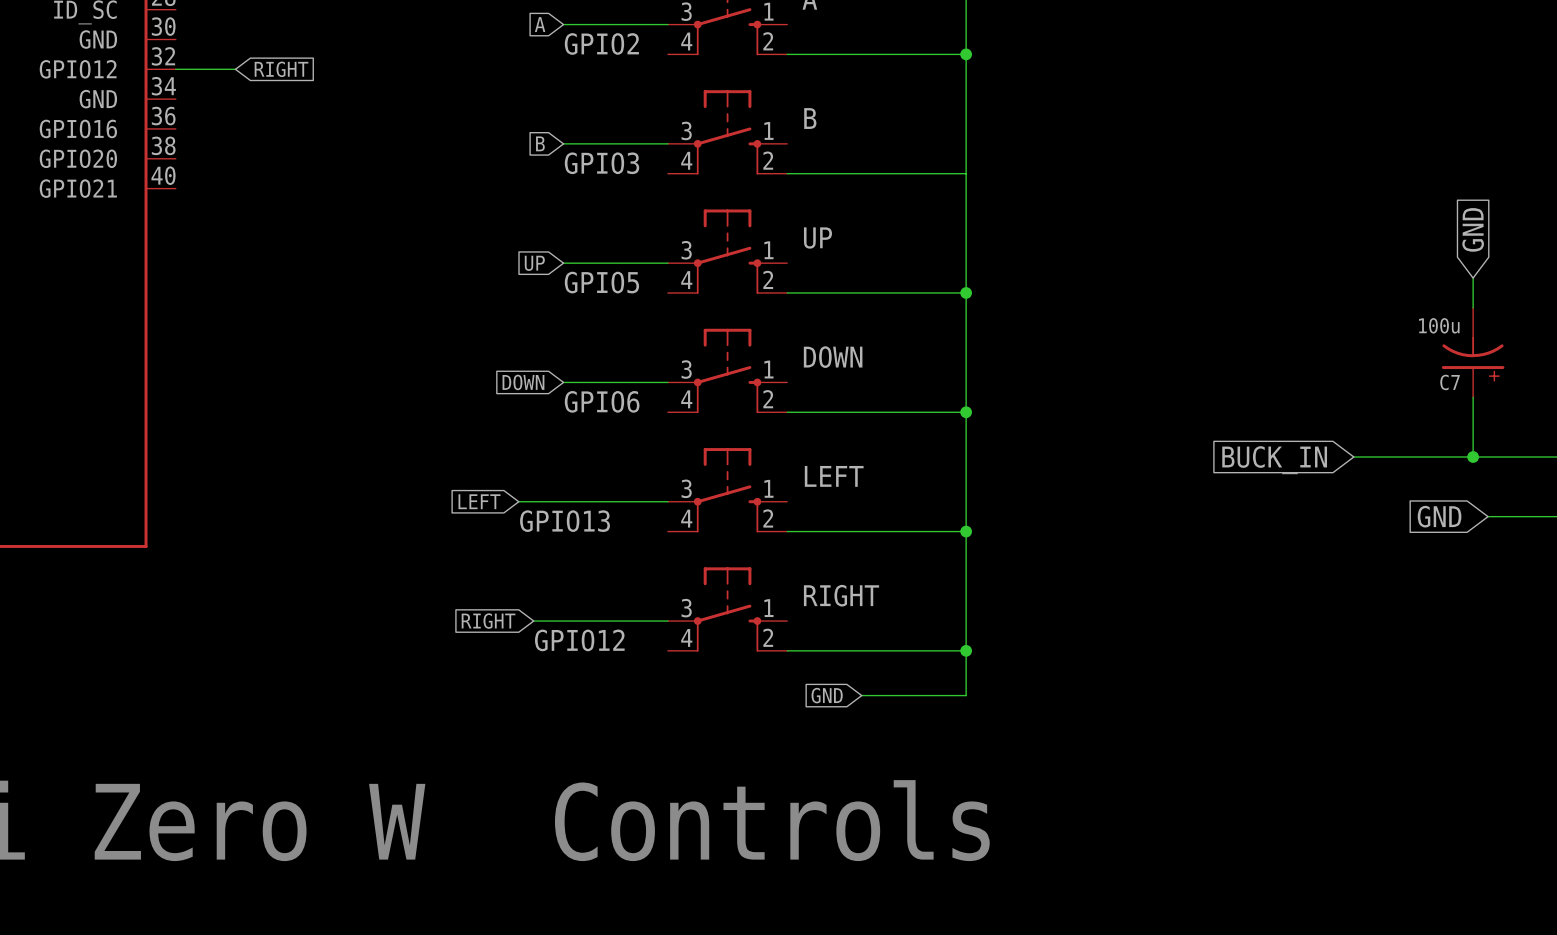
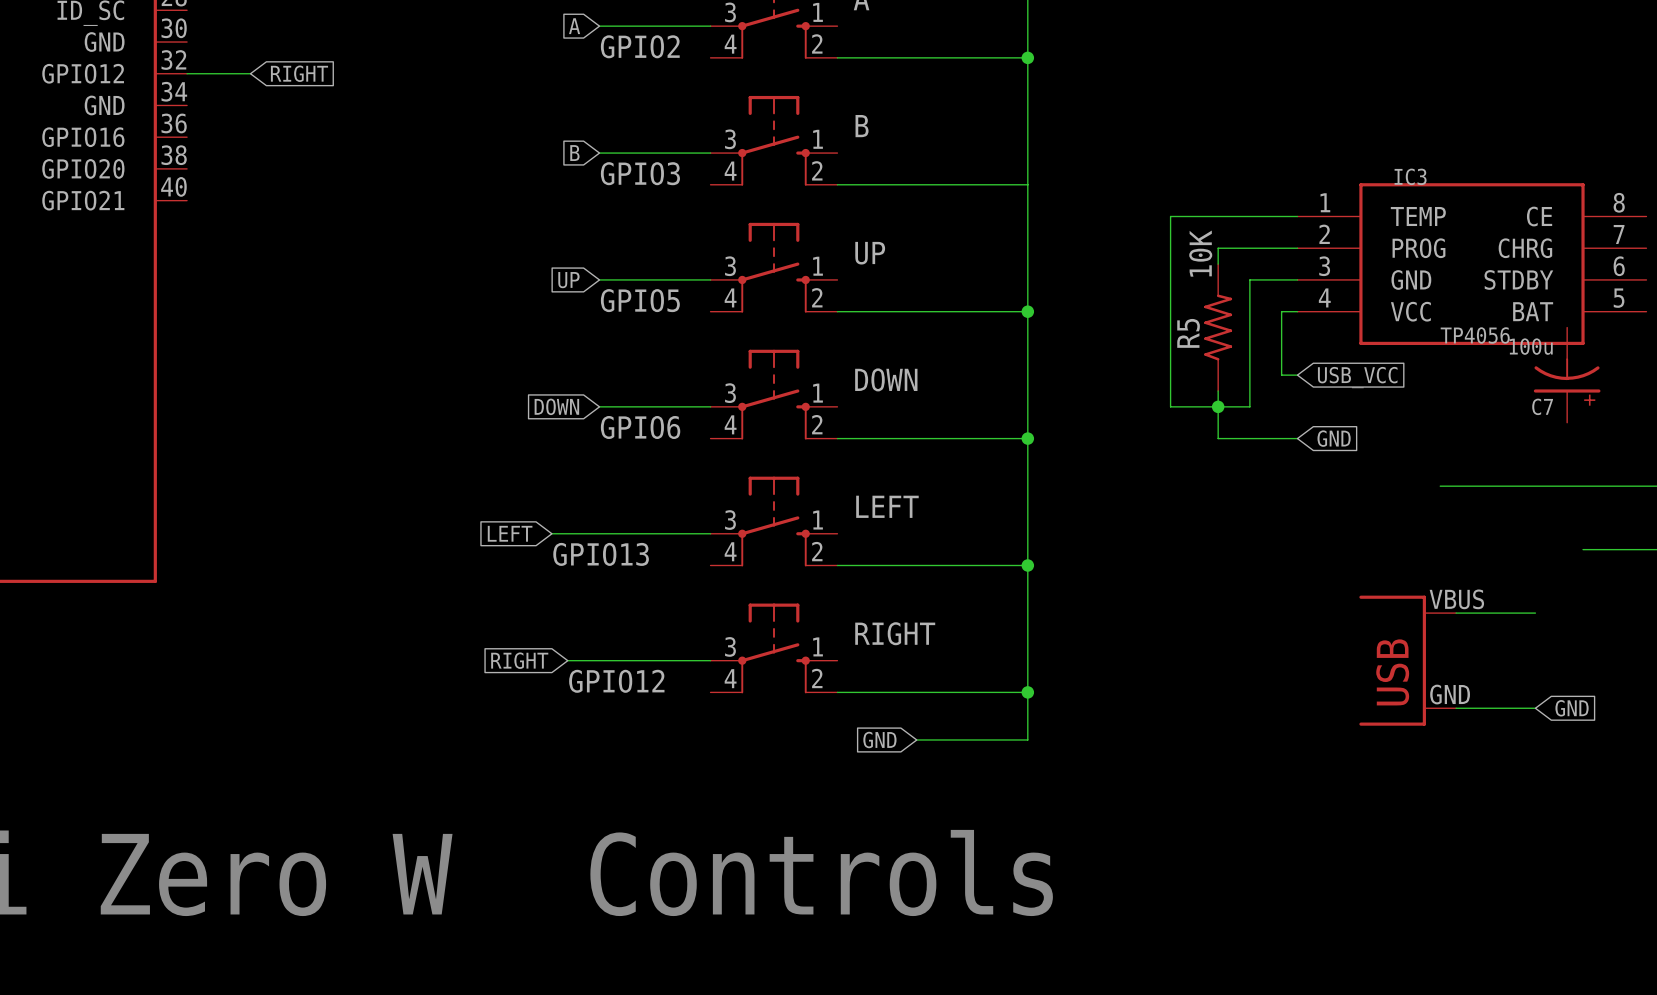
wire: none -> (1297, 216) (1170, 216) (1170, 406) (1249, 406) (1249, 279) (1297, 279)
global label: GND (1473, 229) -> none
wire: none -> (1297, 248) (1218, 248) (1218, 264)
IC3: none -> TP4056 (1471, 264)
wire: (1473, 278) (1473, 307) -> none
wire: none -> (1297, 311) (1281, 311) (1281, 375) (1297, 375)
R5: none -> 10K (1218, 327)
global label: none -> USB_VCC (1357, 377)
wire: none -> (1218, 391) (1218, 438) (1297, 438)
junction: none -> (1218, 406)
wire: (1473, 397) (1473, 457) -> none
global label: none -> GND (1334, 438)
junction: (1473, 457) -> none
global label: BUCK_IN (1274, 460) -> none
global label: GND (1439, 516) -> none
wire: none -> (1456, 613) (1535, 613)
part: none -> (1407, 660)
wire: none -> (1456, 708) (1535, 708)
global label: none -> GND (1572, 708)

